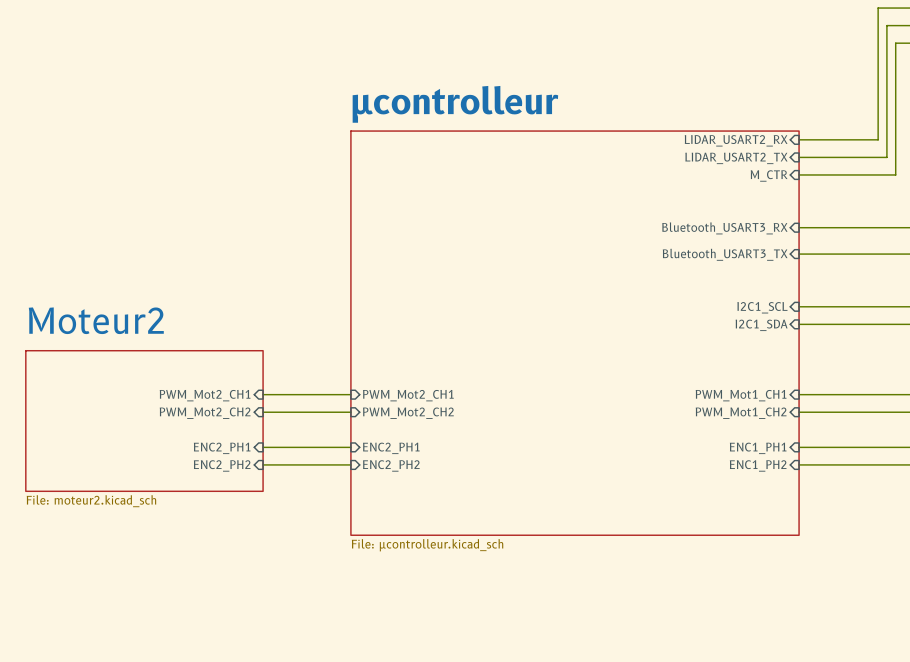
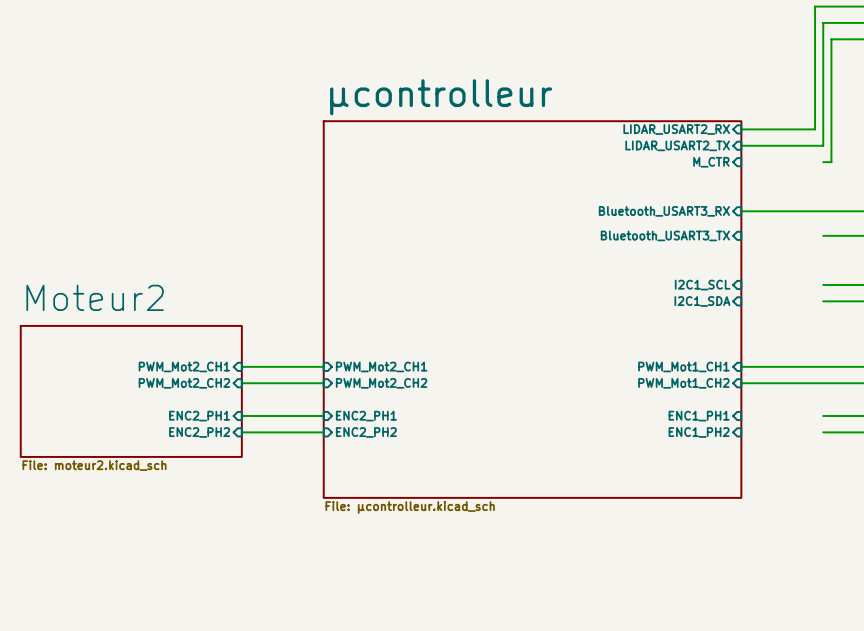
wire: (799, 174) (886, 174) -> none
wire: (799, 254) (886, 254) -> none
wire: (799, 306) (886, 306) -> none
wire: (799, 324) (886, 324) -> none
wire: (799, 447) (886, 447) -> none
wire: (799, 464) (886, 464) -> none

